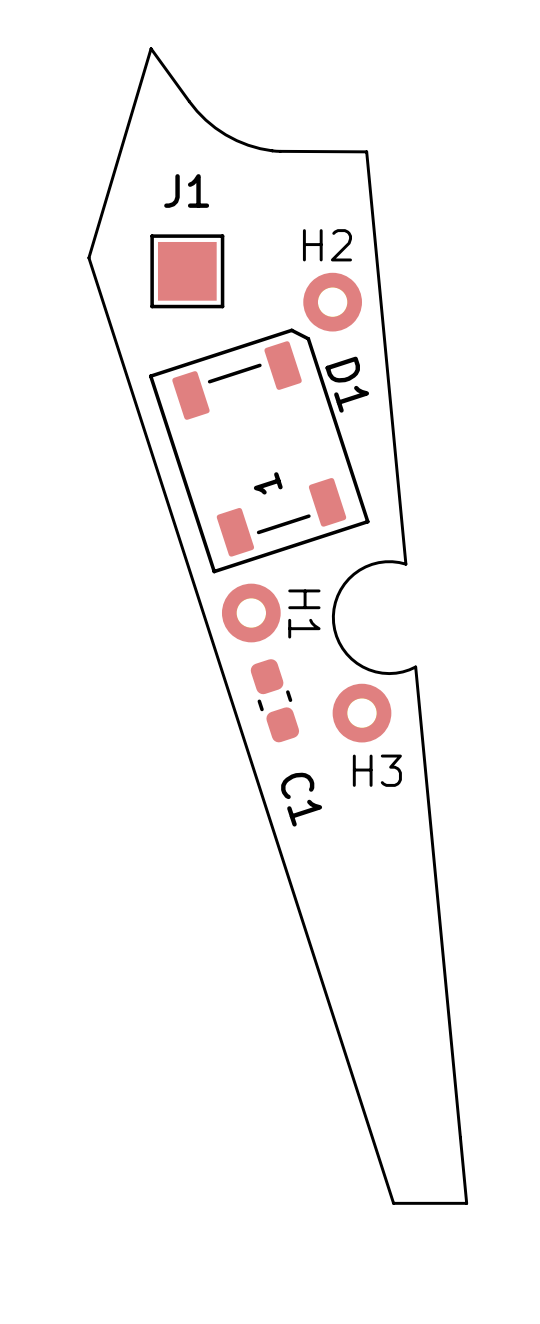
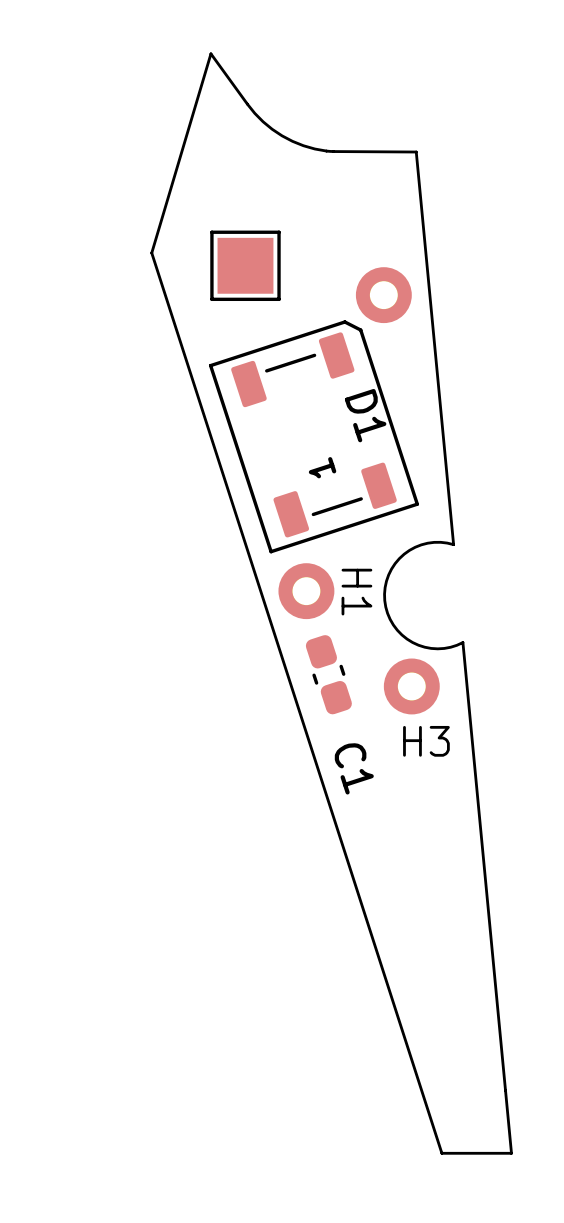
J1 name: J1 (186, 190) -> none
H2 name: H2 (327, 245) -> none
D1 name position: D1 (347, 384) -> D1 (365, 415)

